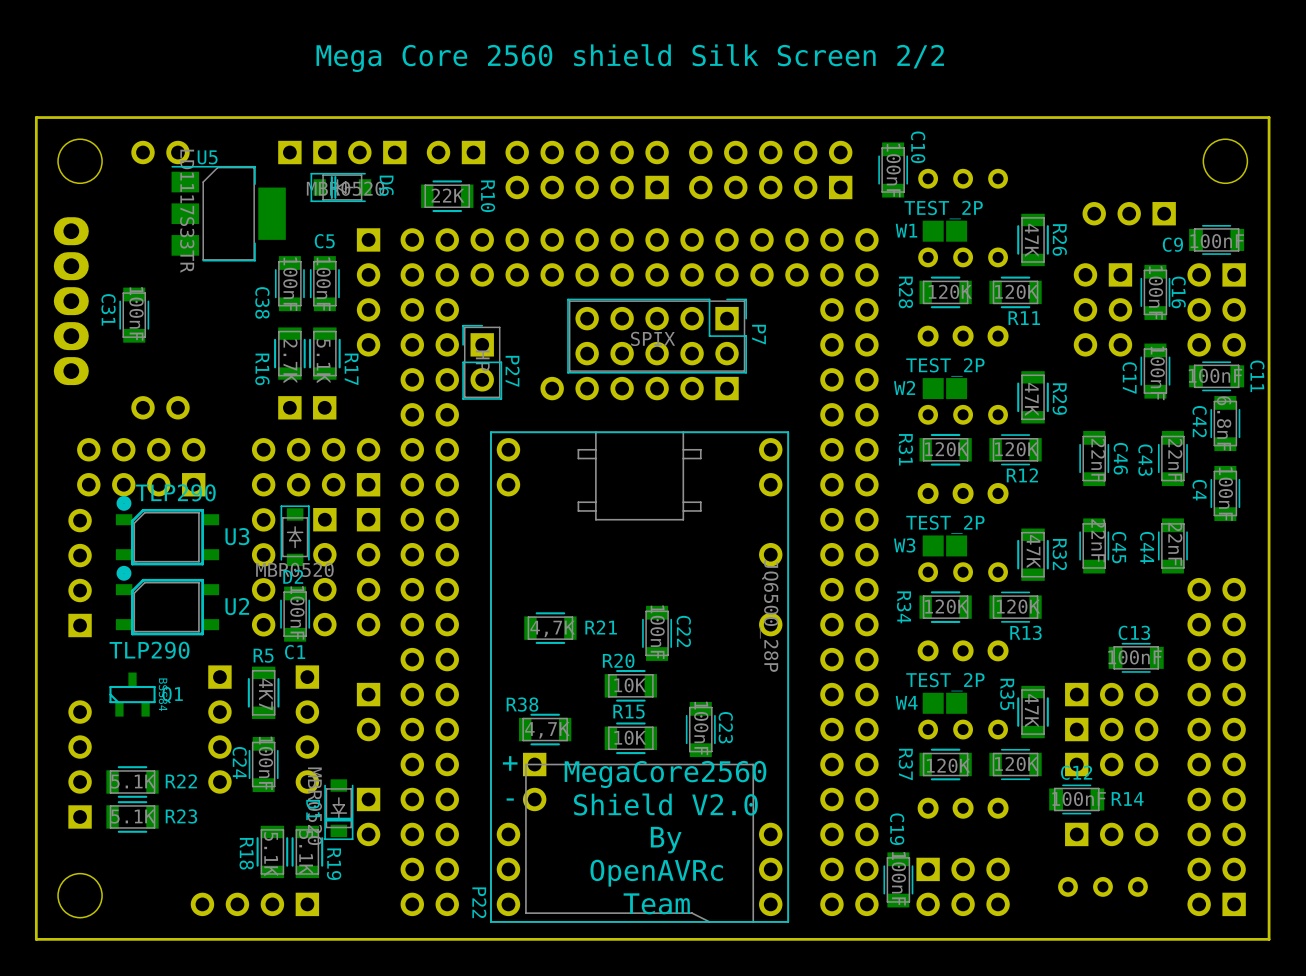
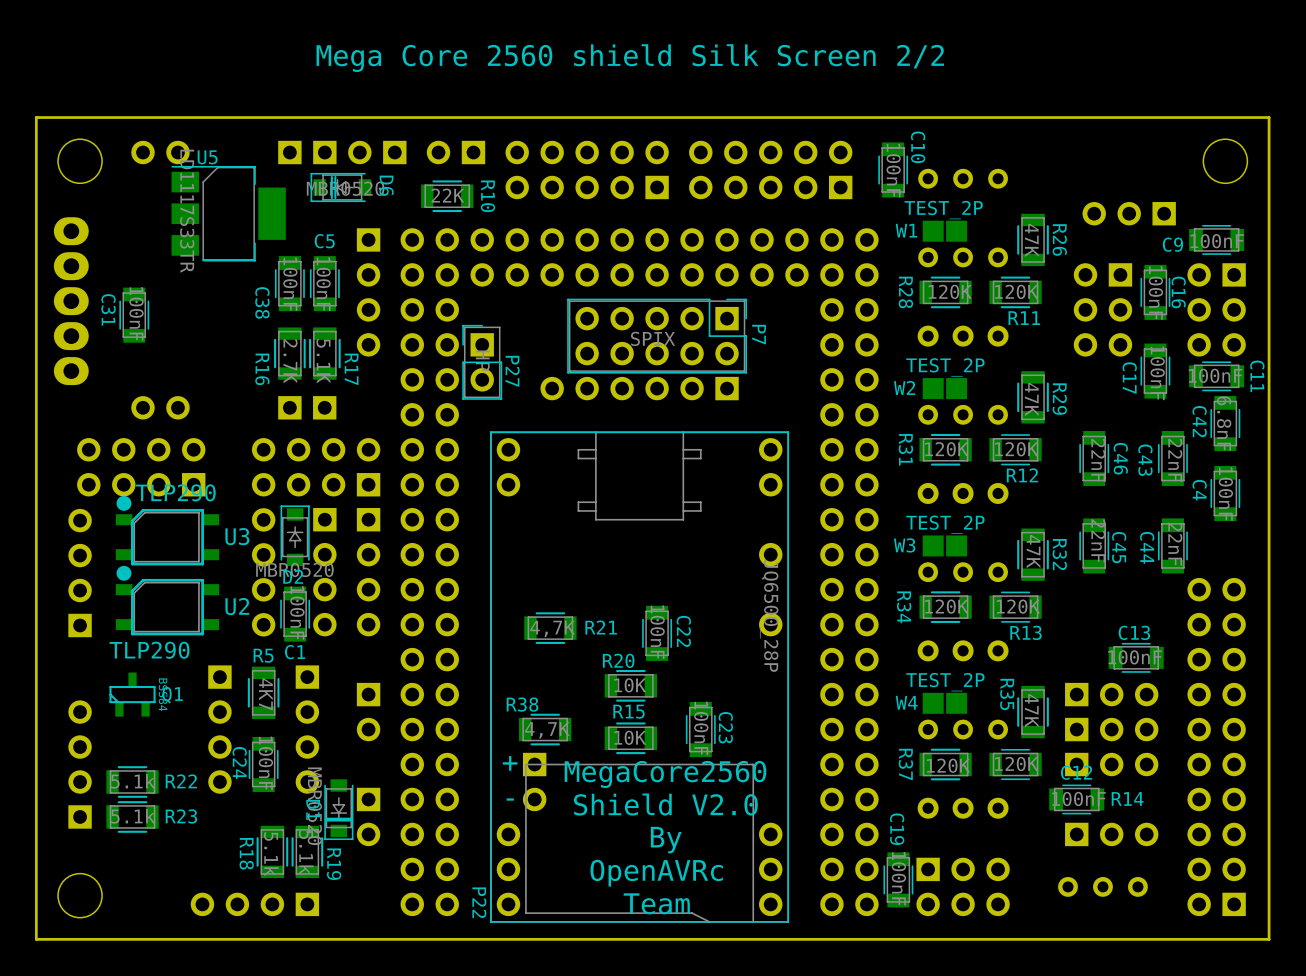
R22 value: 5.1K (133, 781) -> 5.1k (133, 781)
R23 value: 5.1K (133, 816) -> 5.1k (133, 816)
R19 value: 5.1K (306, 852) -> 5.1k (306, 852)
R18 value: 5.1K (271, 854) -> 5.1k (271, 854)

